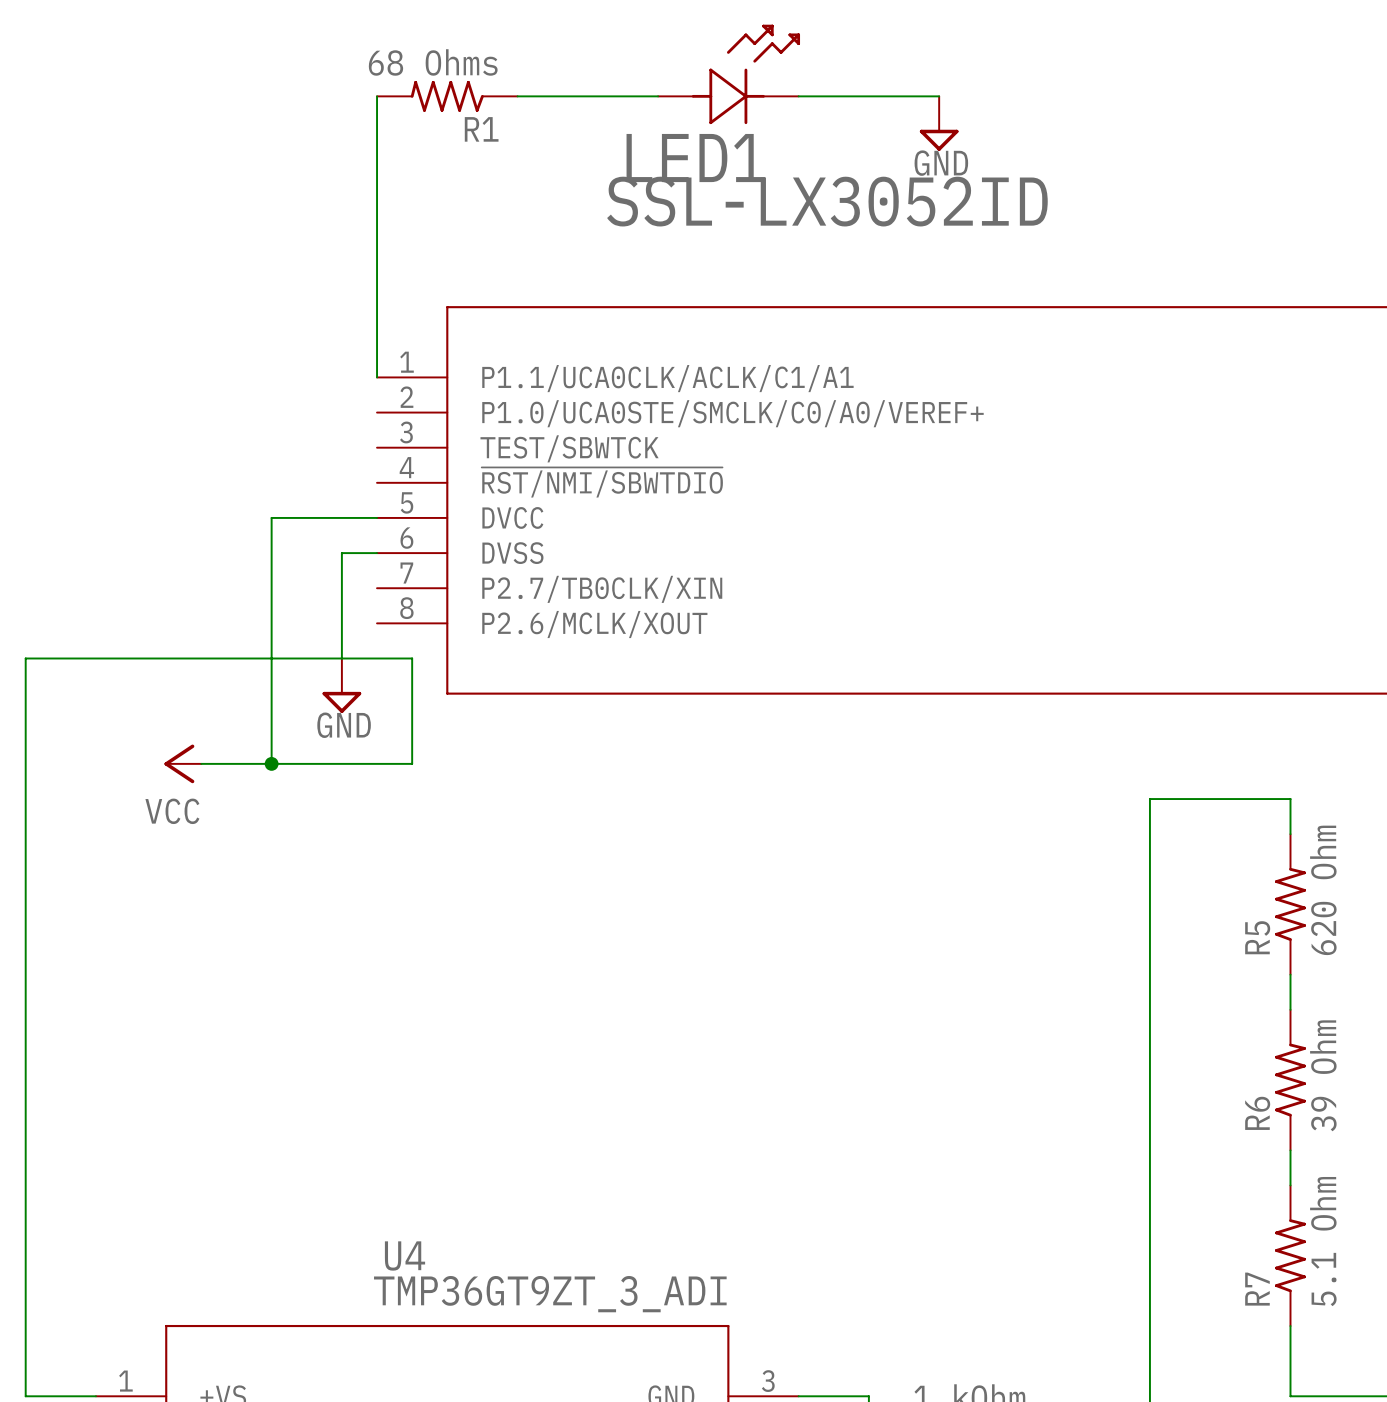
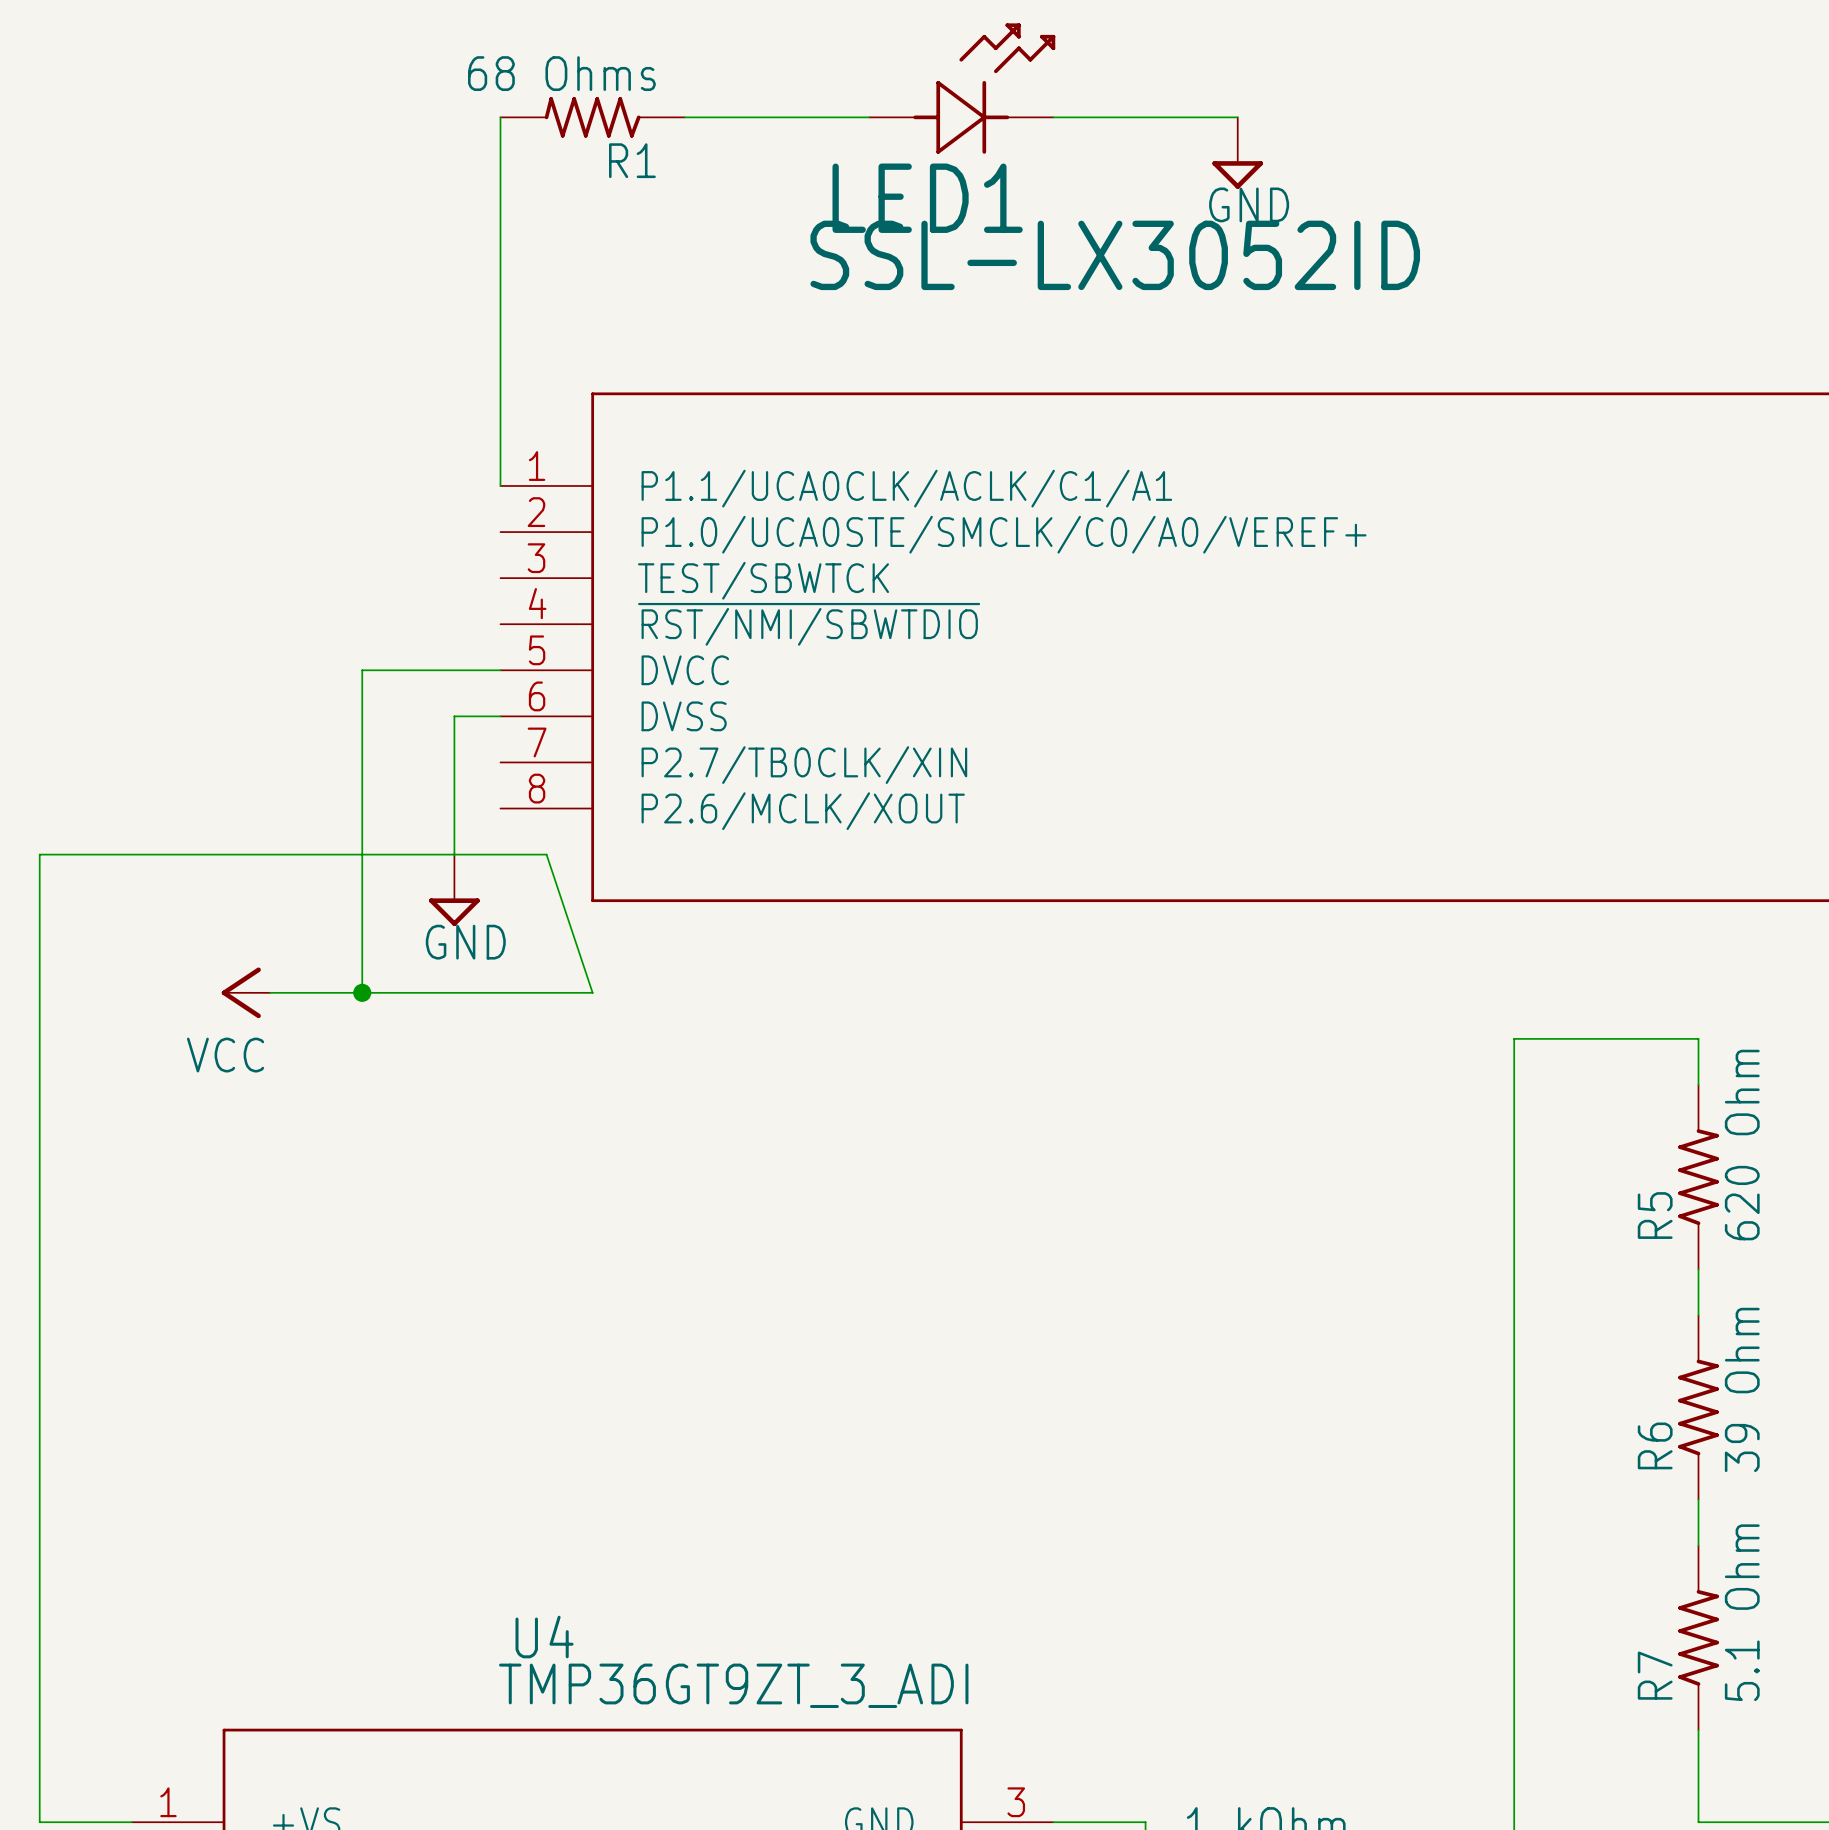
wire: (412, 658) (412, 763) -> (546, 854) (592, 992) (546, 992)

